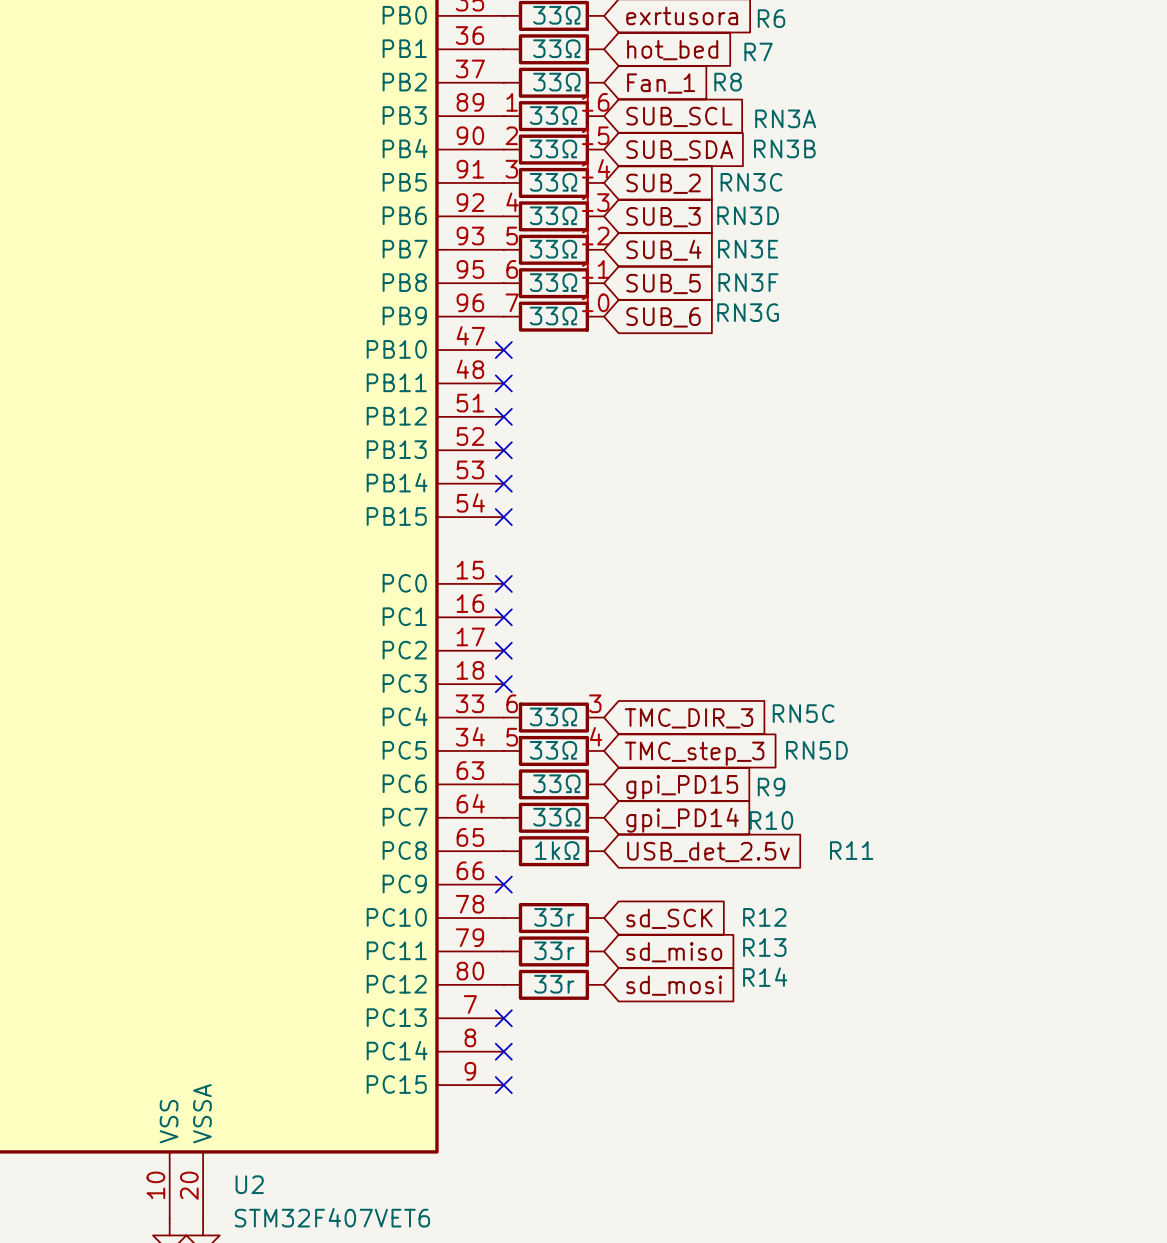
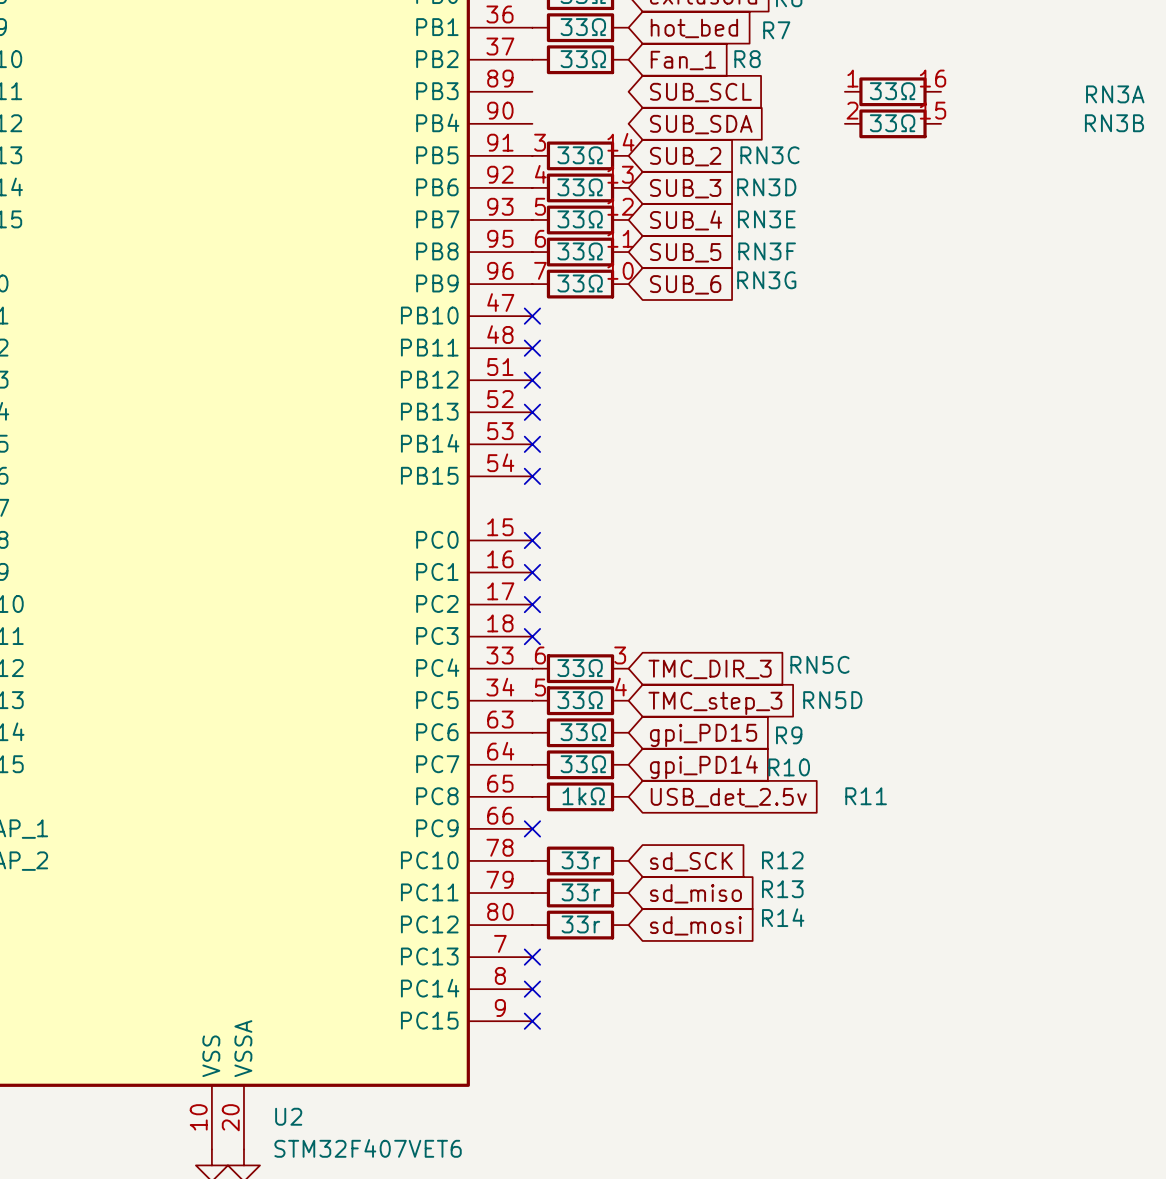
RN3A position: (553, 116) -> (892, 91)
RN3B position: (553, 149) -> (892, 123)

